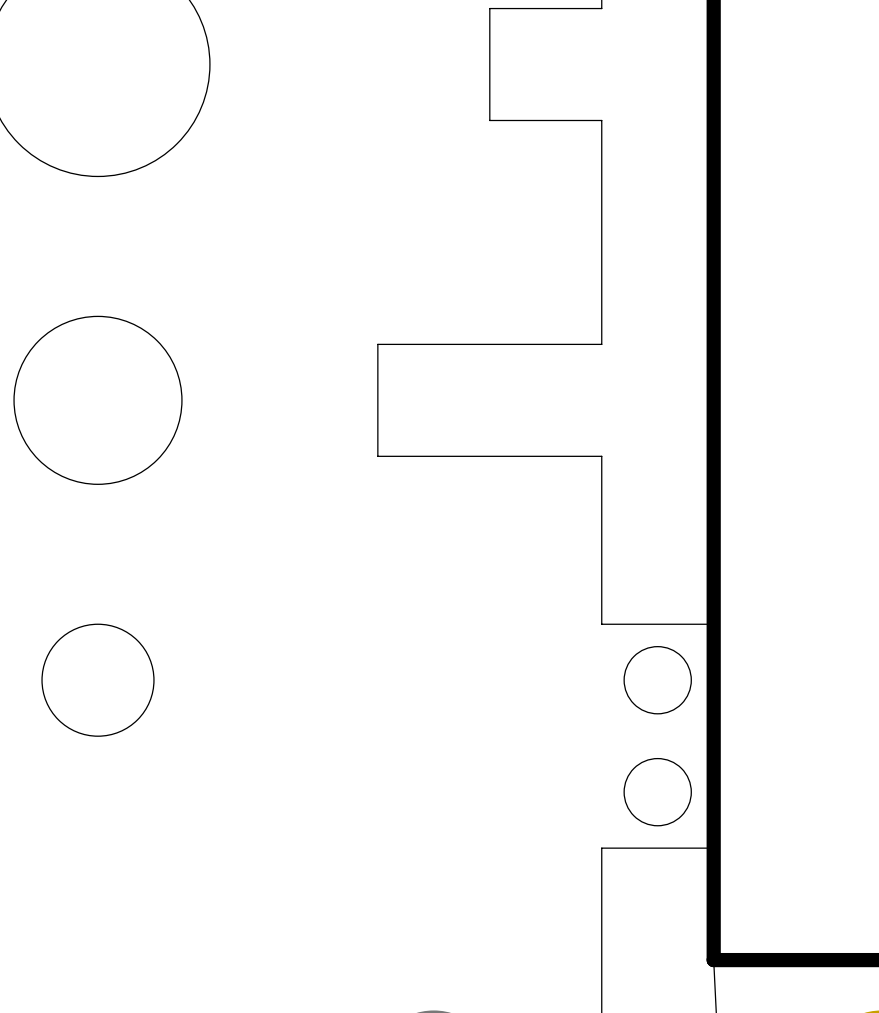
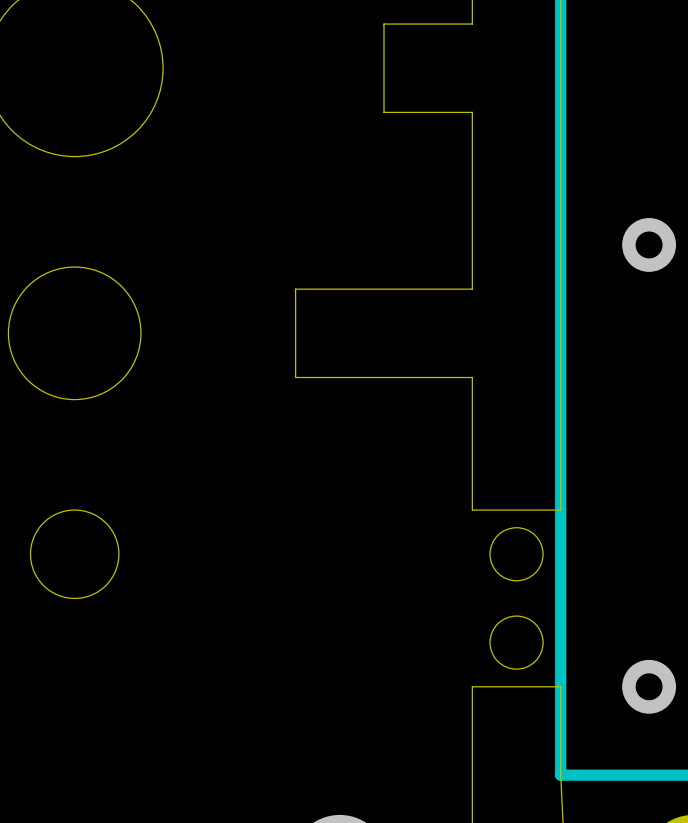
via: none -> (649, 244)
via: none -> (649, 686)

